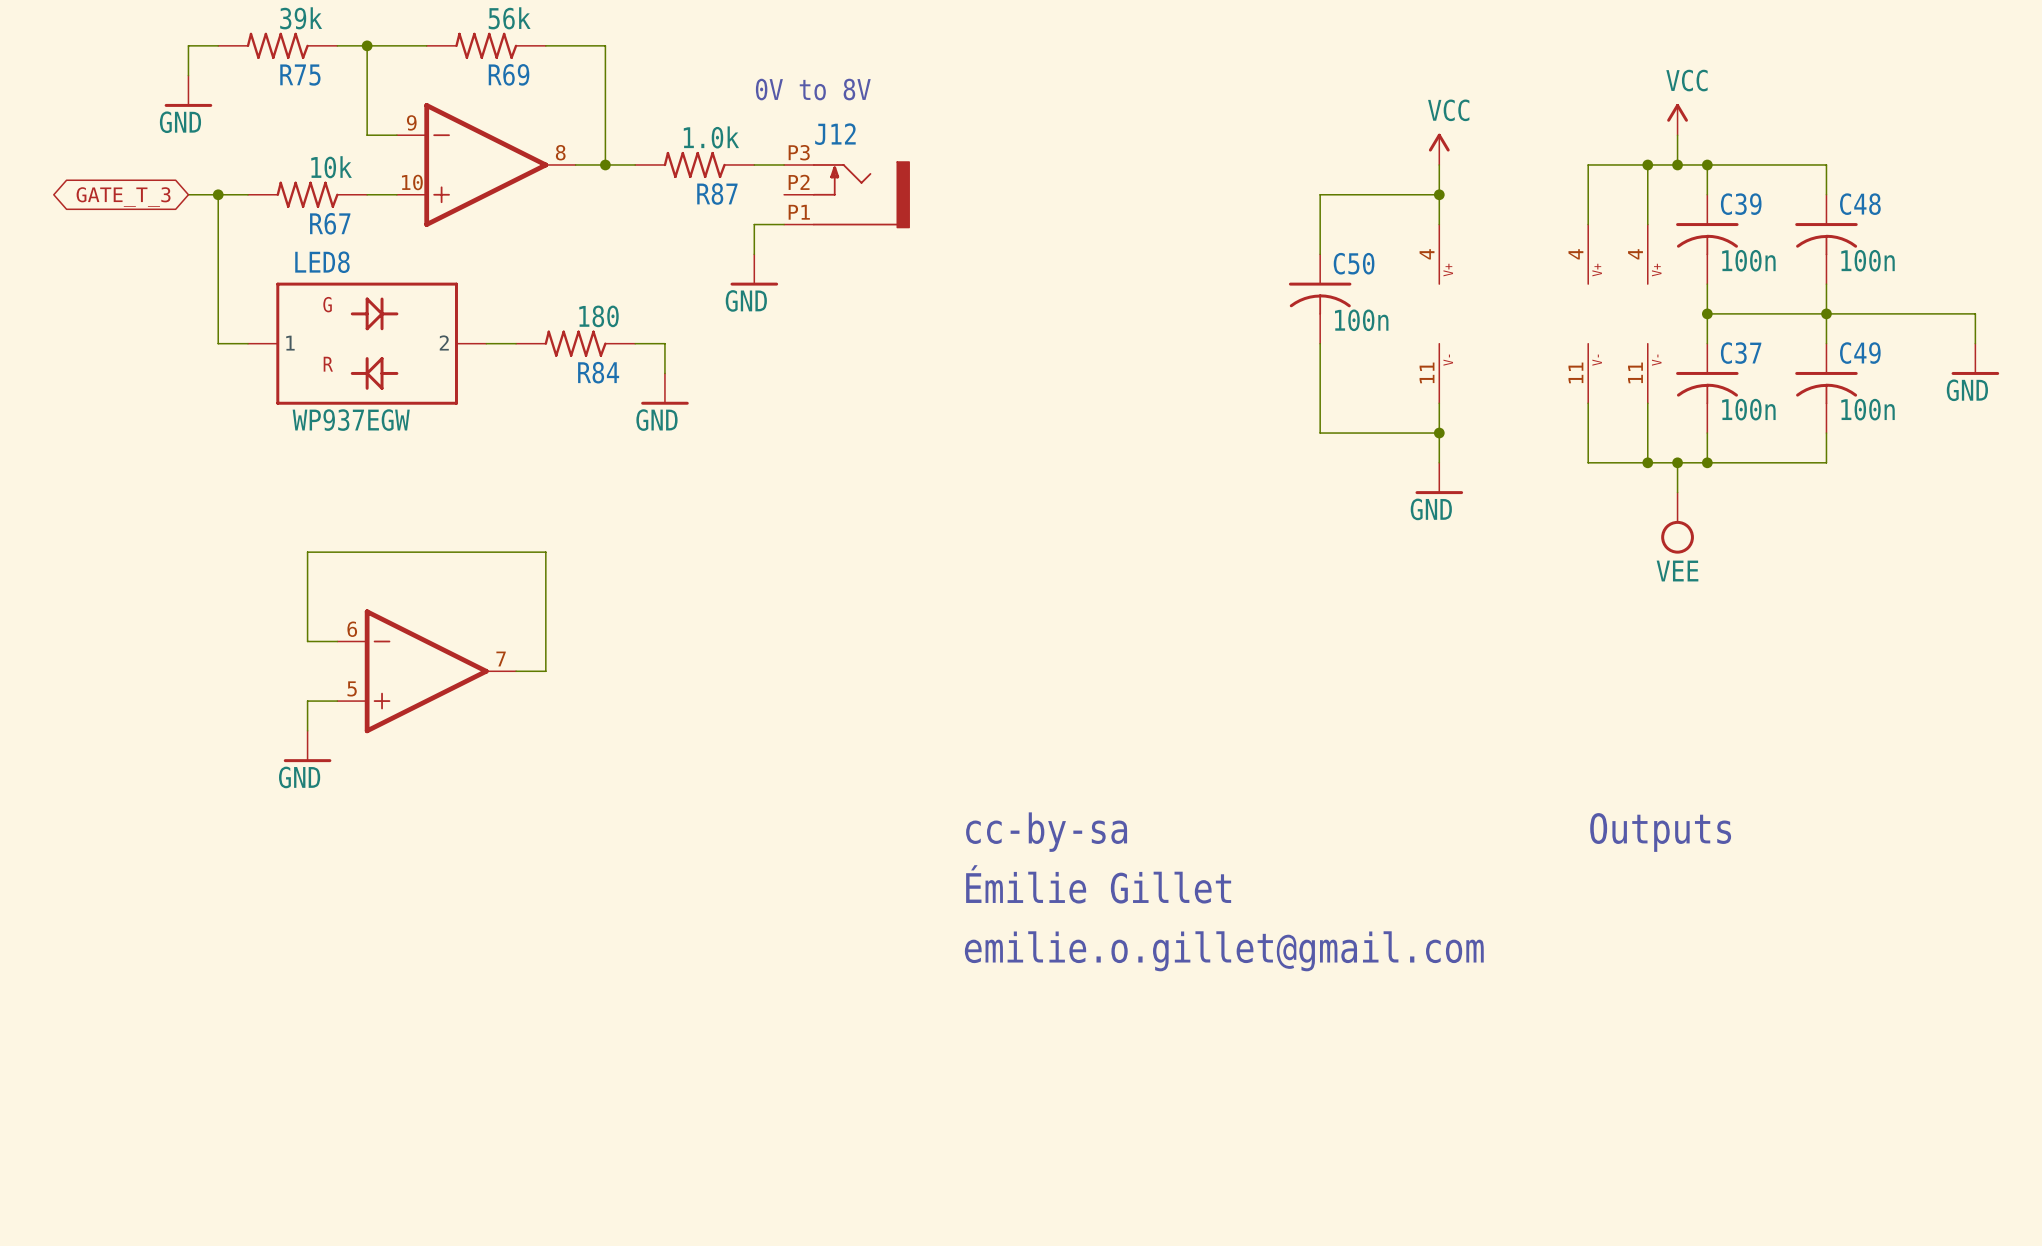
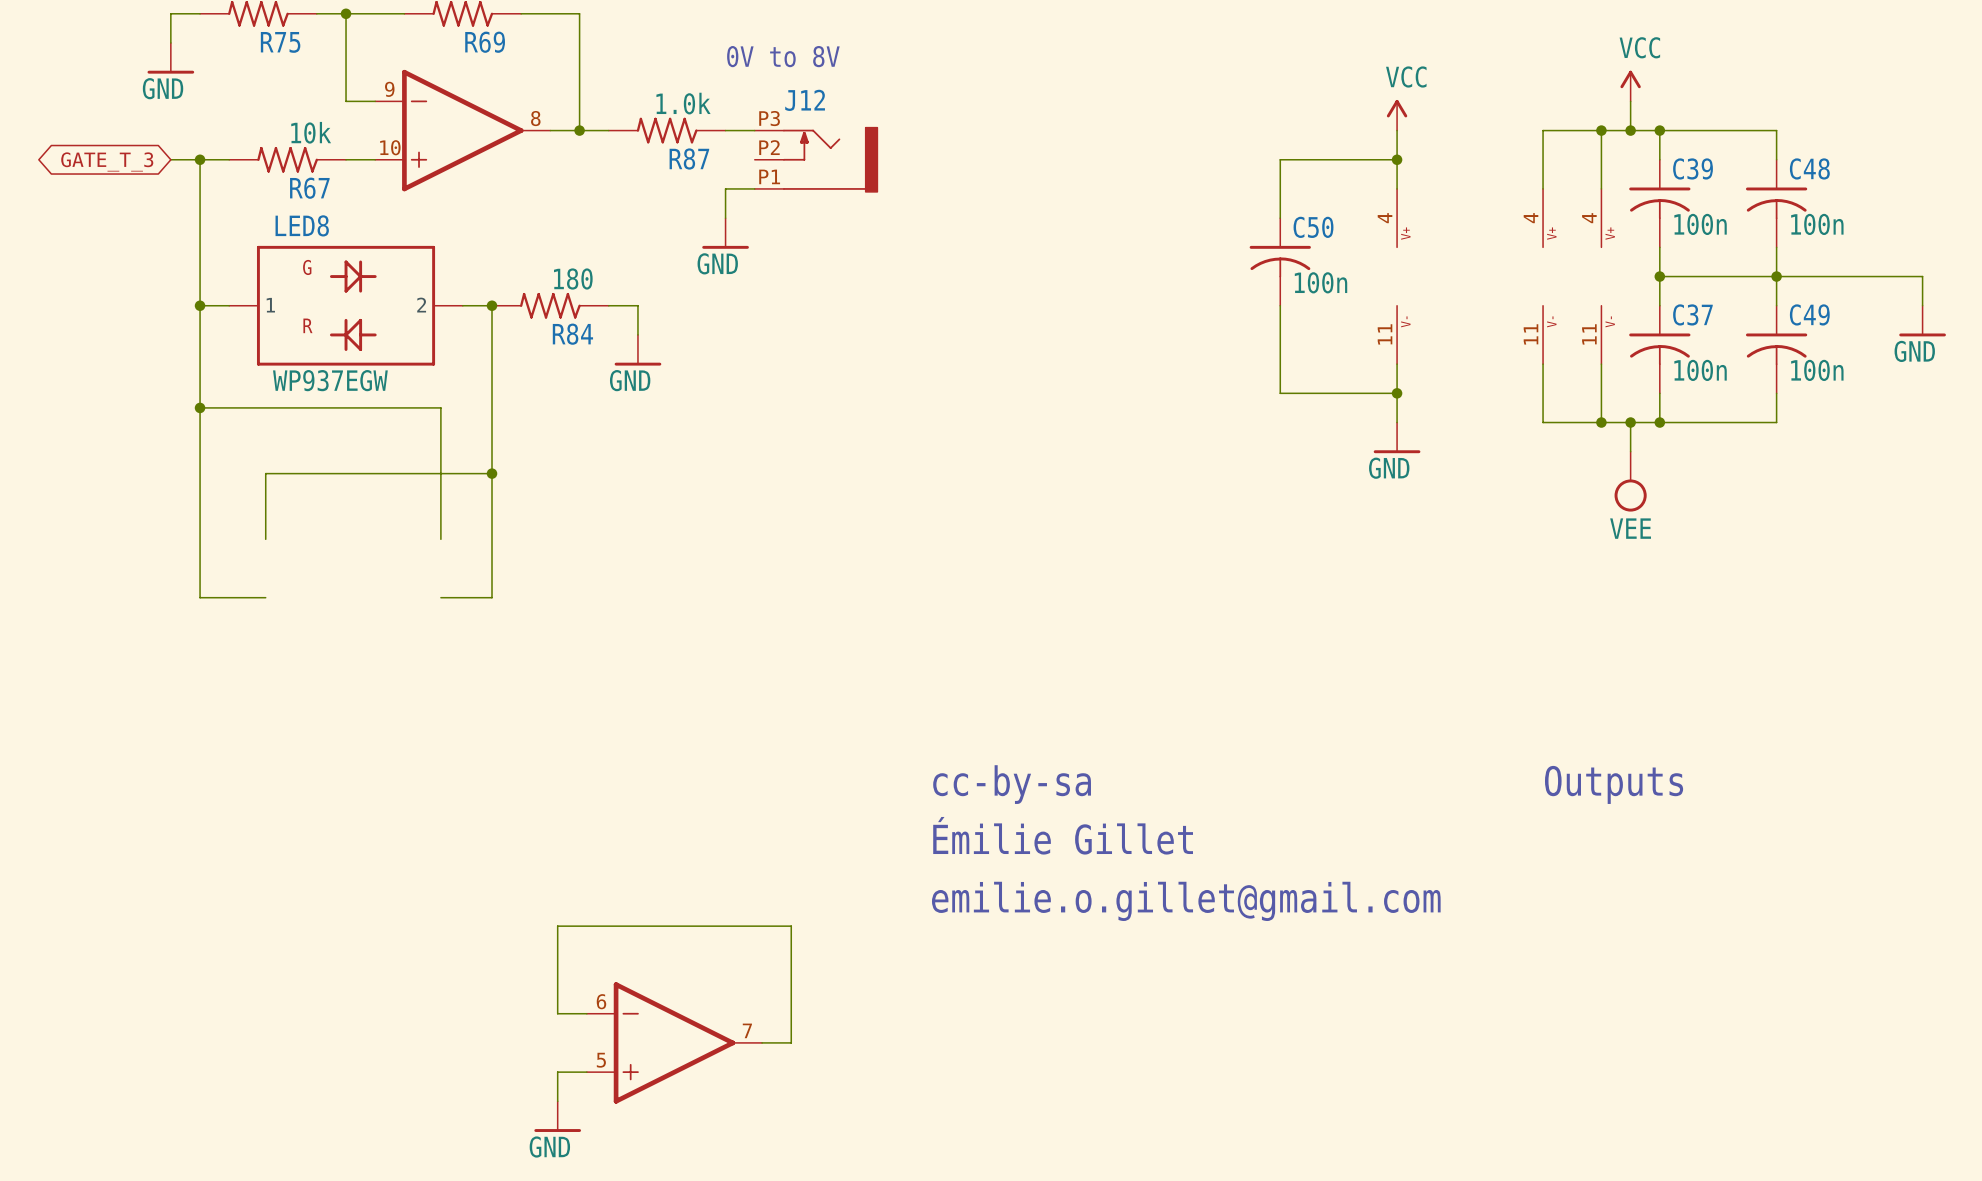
wire: none -> (200, 305) (200, 597) (265, 597)
junction: none -> (200, 305)
wire: none -> (492, 305) (492, 597) (440, 597)
junction: none -> (492, 305)
wire: none -> (200, 407) (440, 407) (440, 539)
junction: none -> (200, 407)
wire: none -> (492, 473) (265, 473) (265, 539)
junction: none -> (492, 473)
wire: (337, 641) (307, 641) (307, 552) (545, 552) (545, 671) (516, 671) -> none
part: (426, 671) -> none
wire: (337, 701) (307, 701) (307, 730) -> none
power symbol: GND (307, 746) -> none
wire: none -> (586, 1013) (557, 1013) (557, 926) (791, 926) (791, 1042) (762, 1042)
part: none -> (674, 1042)
wire: none -> (586, 1072) (557, 1072) (557, 1101)
power symbol: none -> GND (557, 1116)

